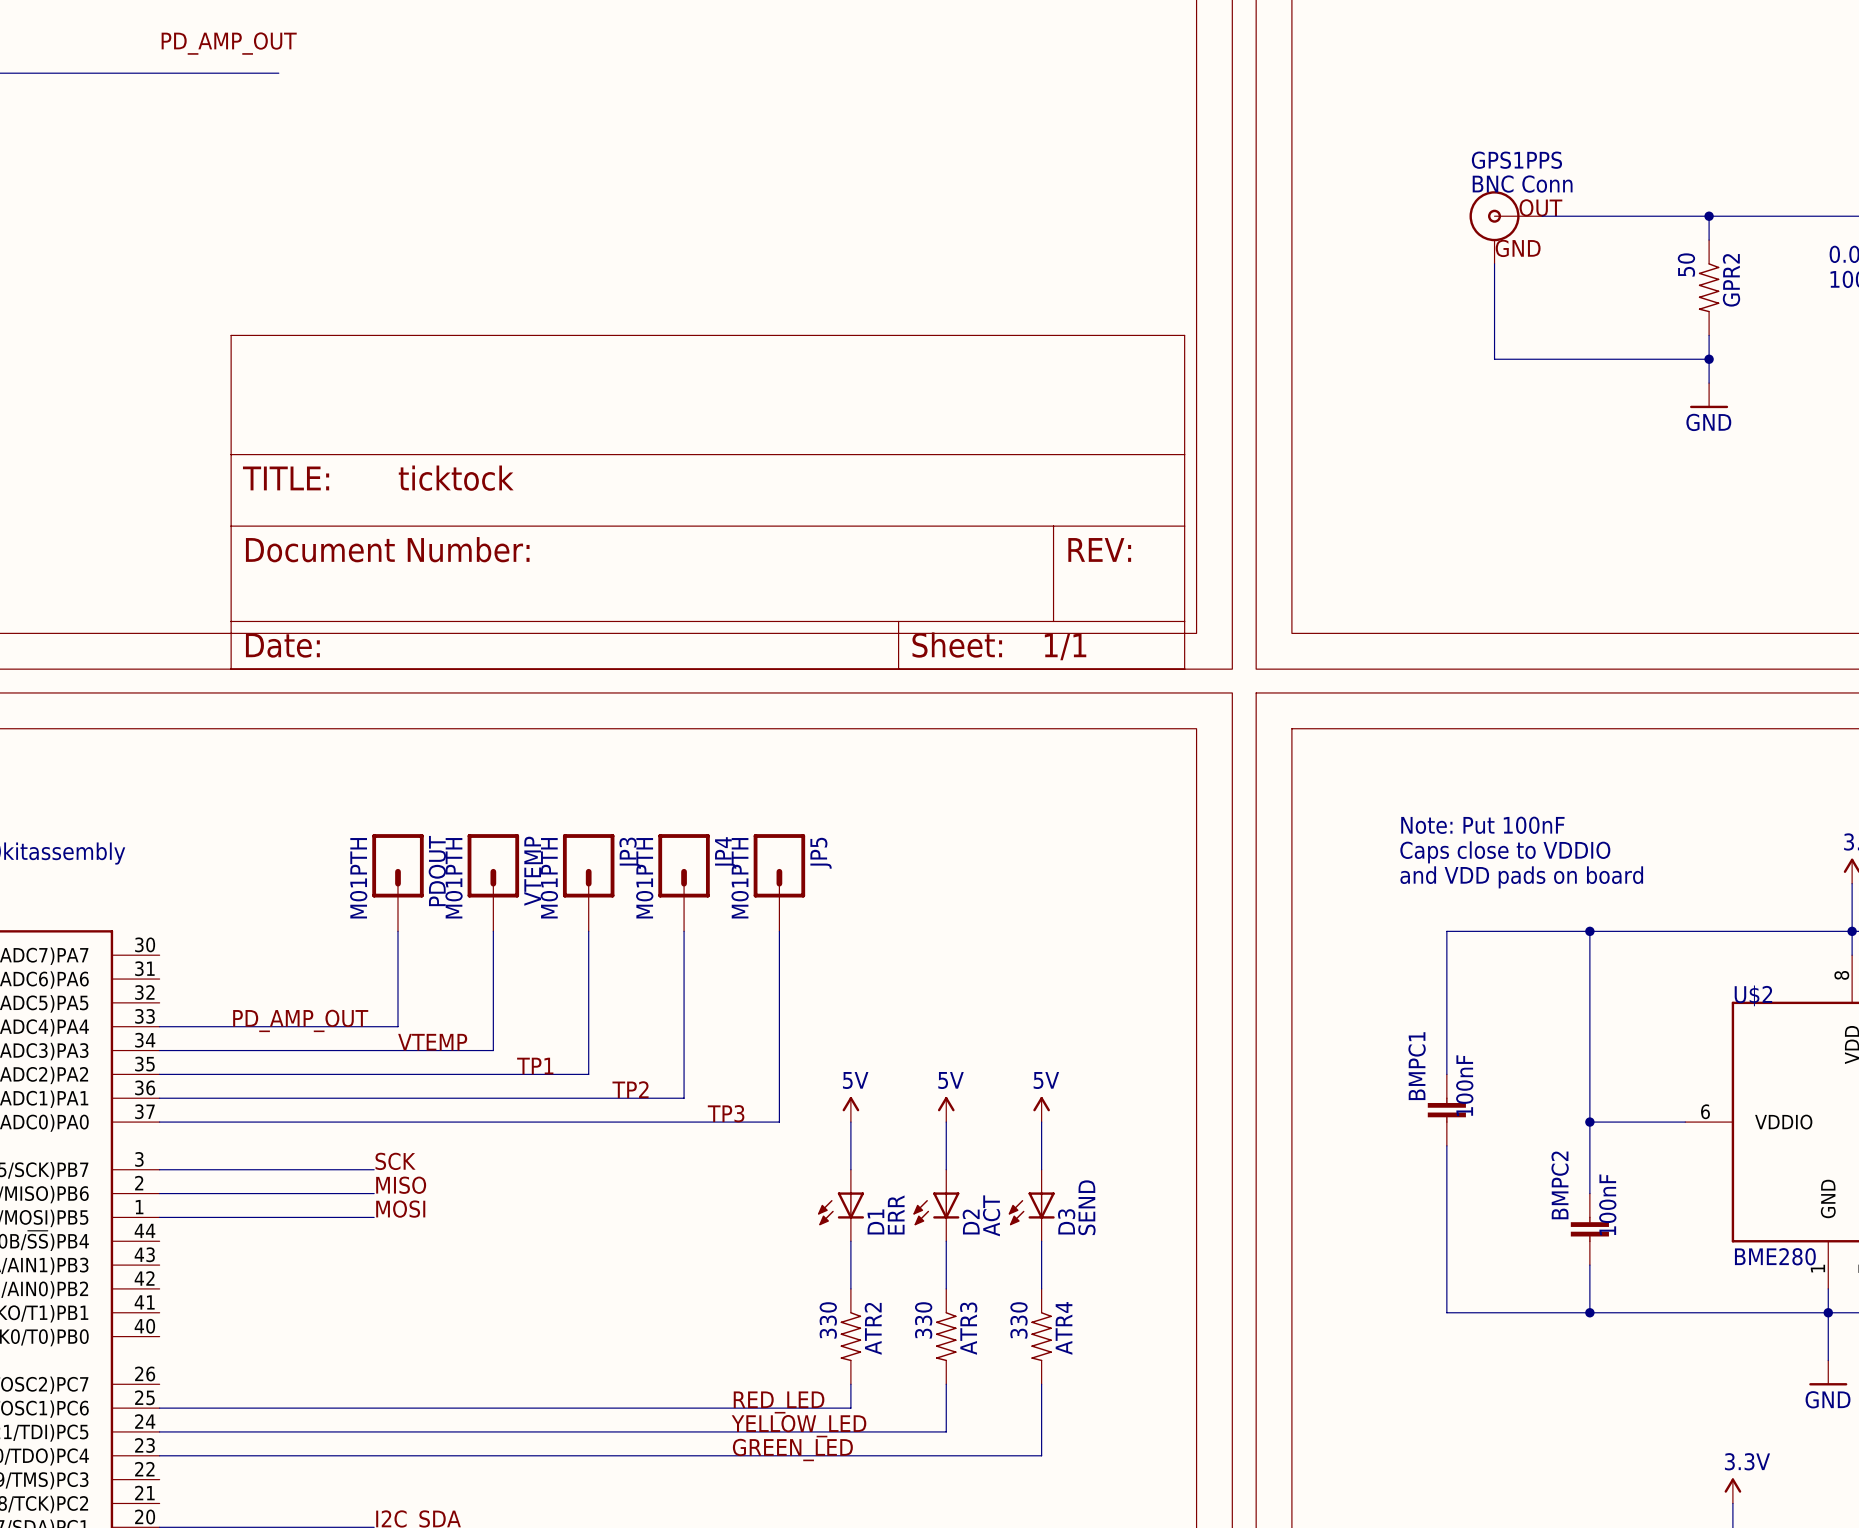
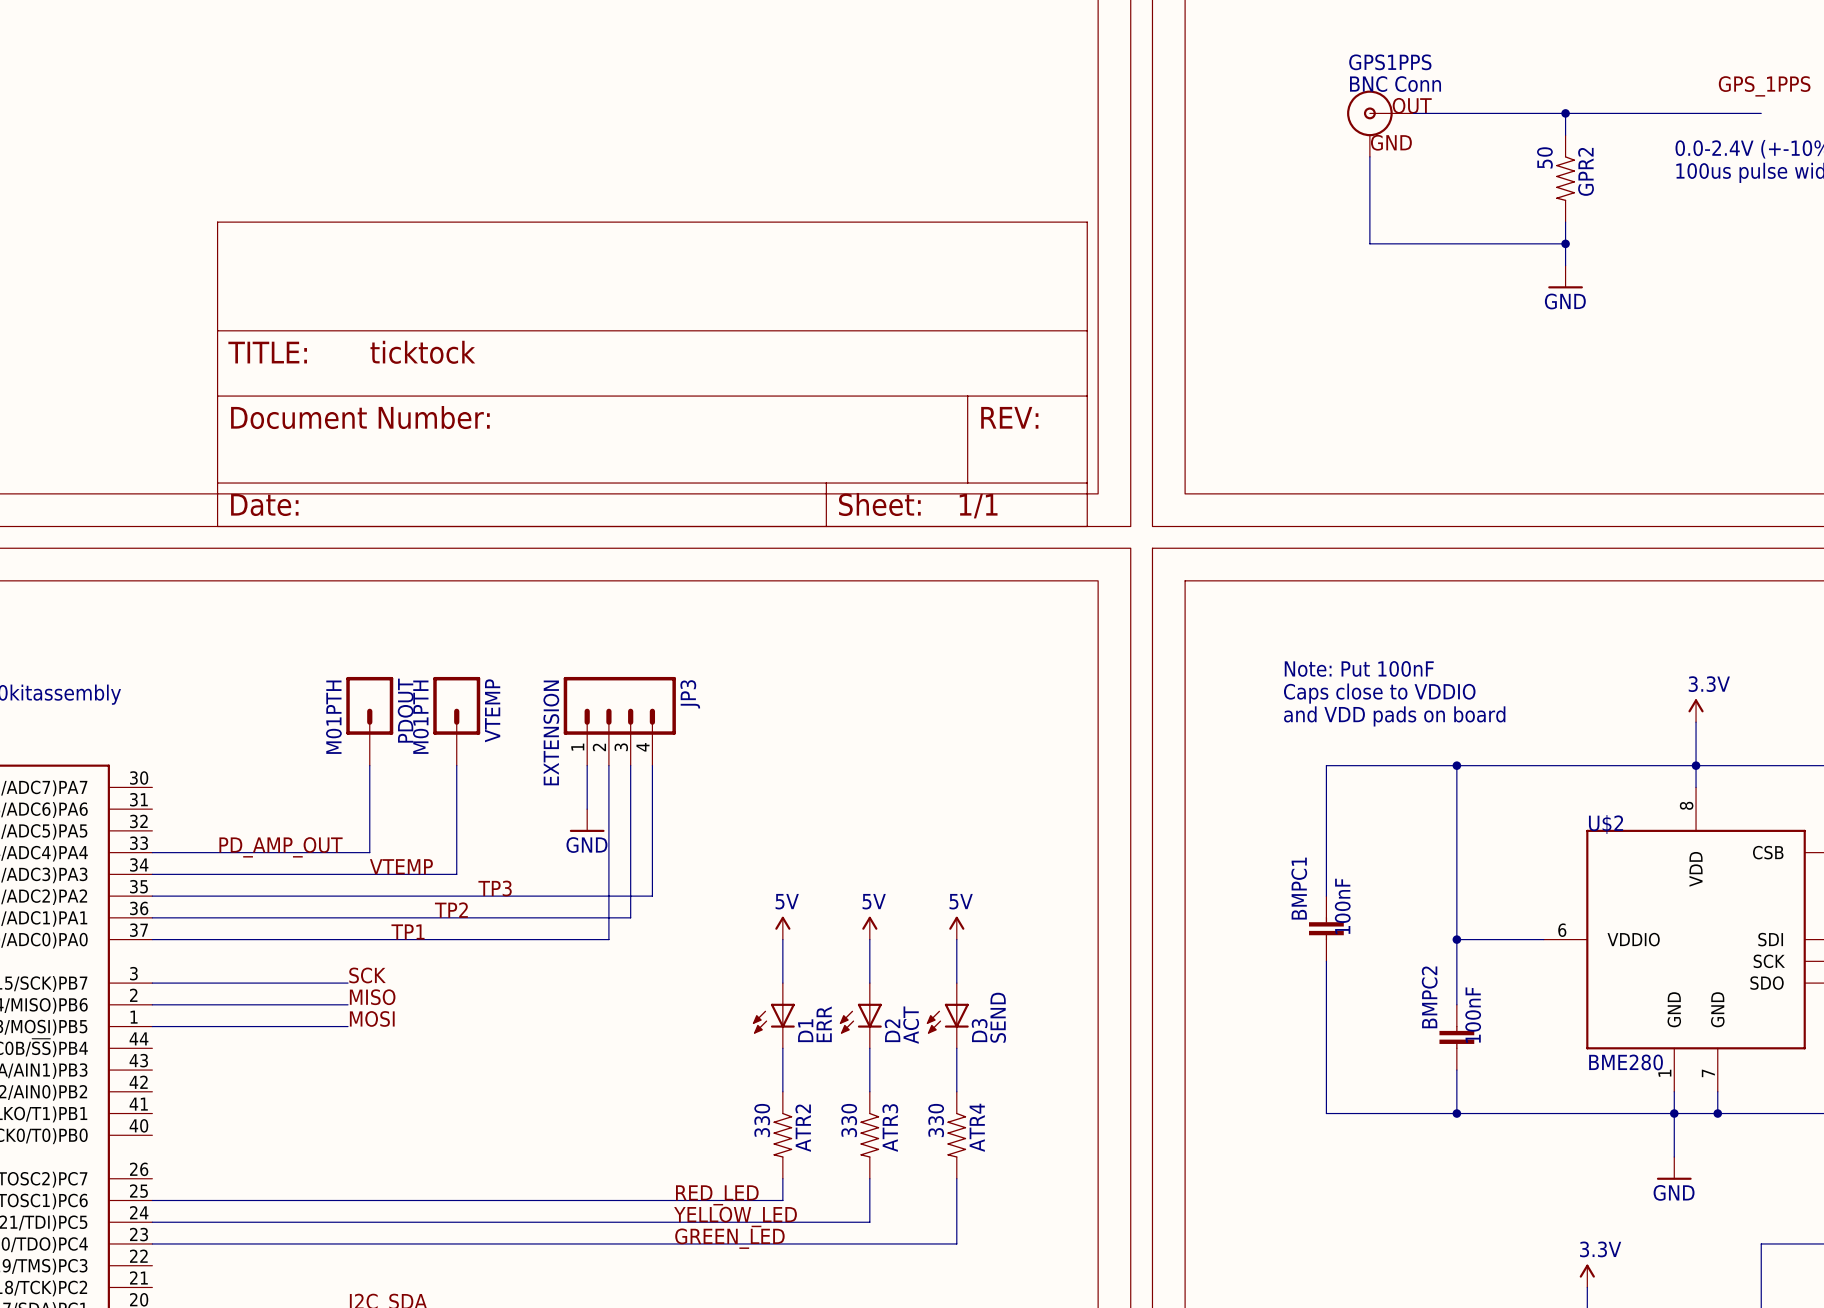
JP3 symbol: [562, 834, 615, 932] -> [563, 676, 676, 766]
JP3 name position: JP3 (630, 853) -> JP3 (690, 694)
JP3 value: M01PTH (549, 878) -> EXTENSION (551, 732)
JP4: M01PTH (684, 882) -> none
JP5: M01PTH (779, 882) -> none
wire: (588, 931) (588, 1074) -> (652, 765) (652, 896) (543, 896)
wire: none -> (587, 765) (587, 809)
wire: (779, 931) (779, 1122) (660, 1122) -> (608, 765) (608, 939)
power symbol: none -> GND (587, 820)
label: TP1 (535, 1066) -> TP3 (495, 888)
label position: TP2 (630, 1089) -> TP2 (451, 910)
label: none -> TP1 (407, 931)
label: TP3 (726, 1113) -> none

